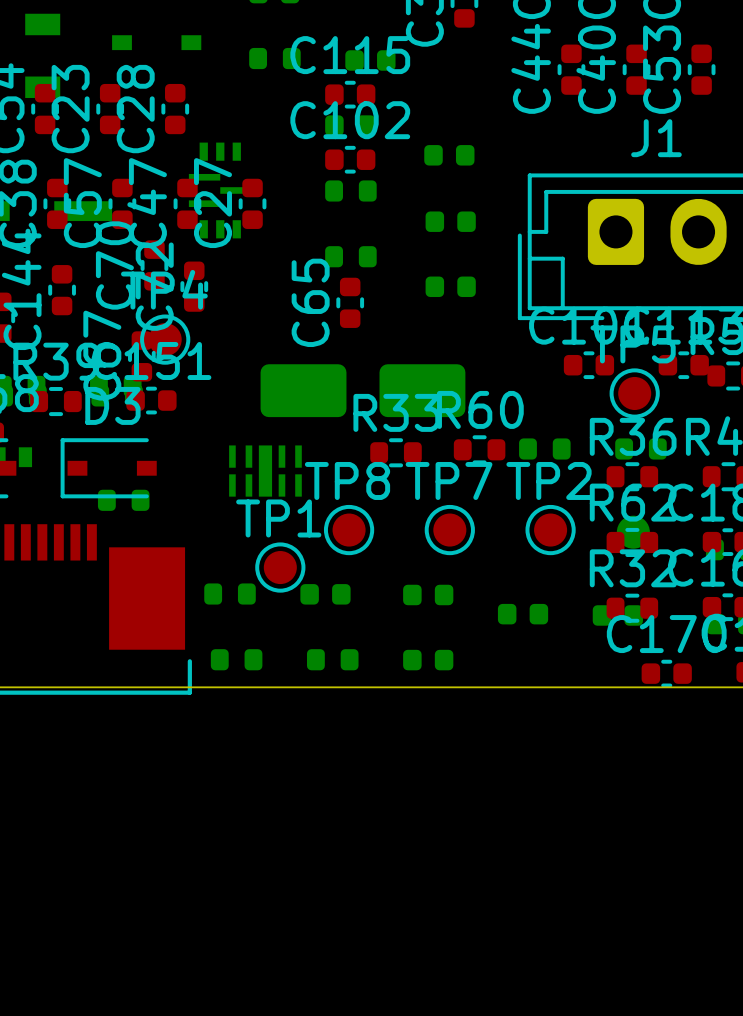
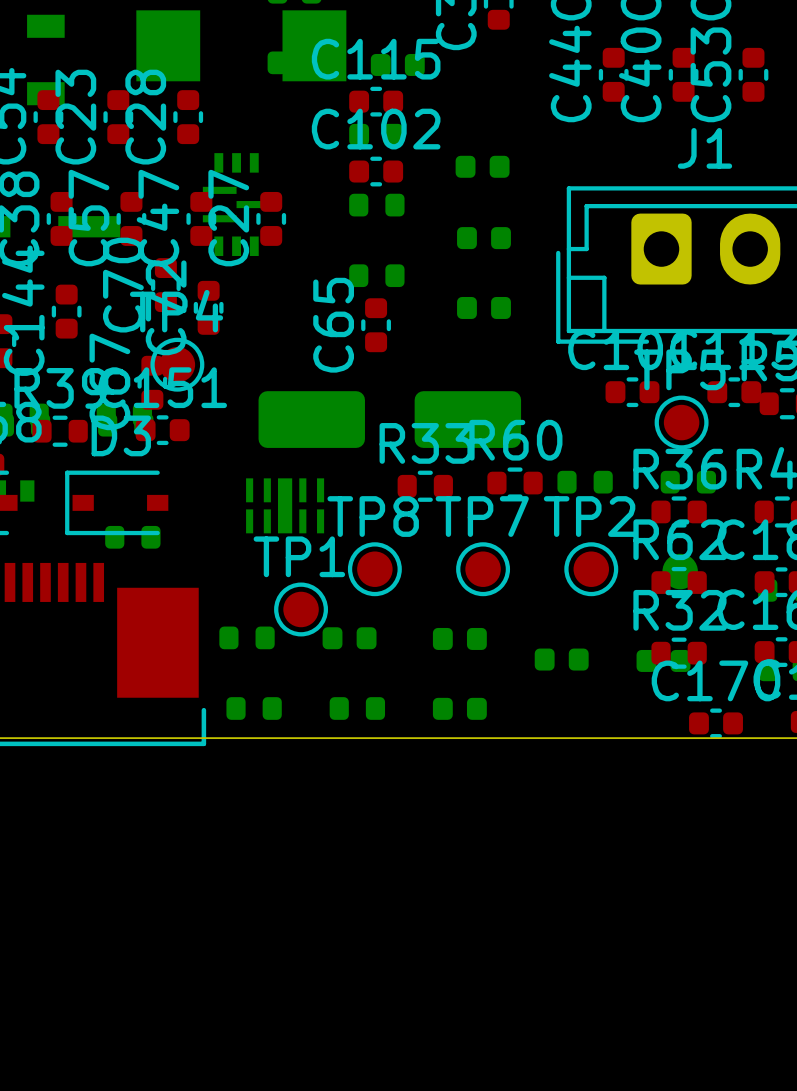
part: (156, 42) -> none
part: none -> (241, 45)
part footprint: [260, 364, 466, 418] -> [258, 391, 522, 448]

